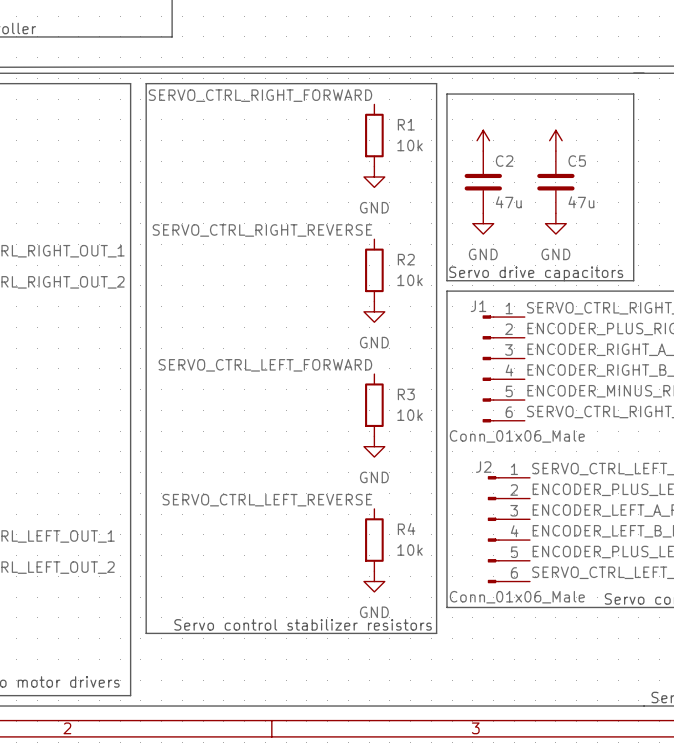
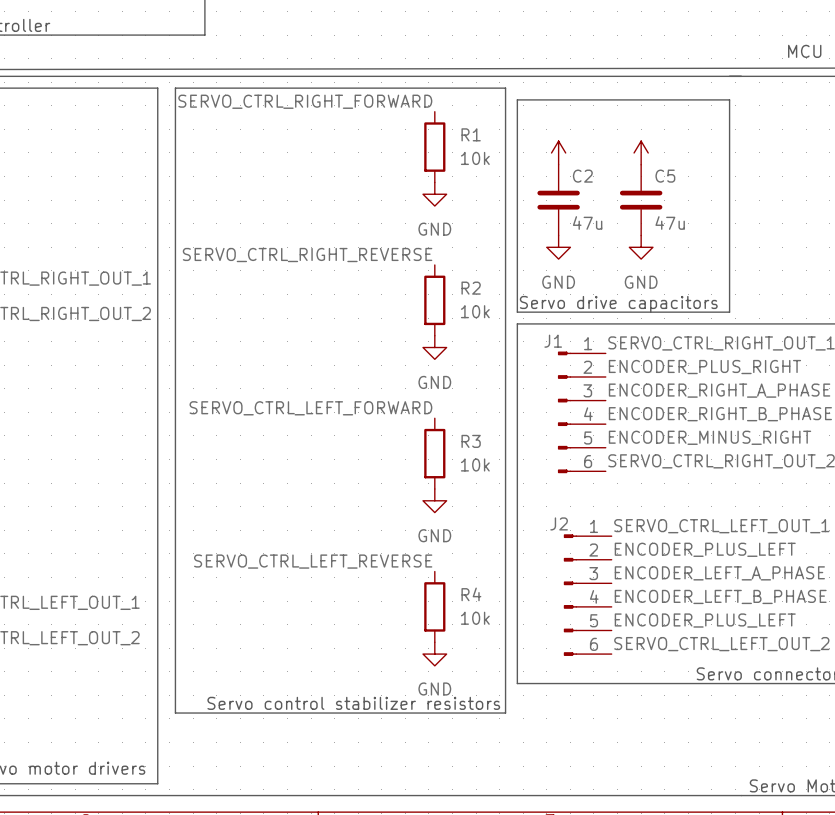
J1 value: Conn_01x06_Male (517, 436) -> none
J2 value: Conn_01x06_Male (517, 597) -> none

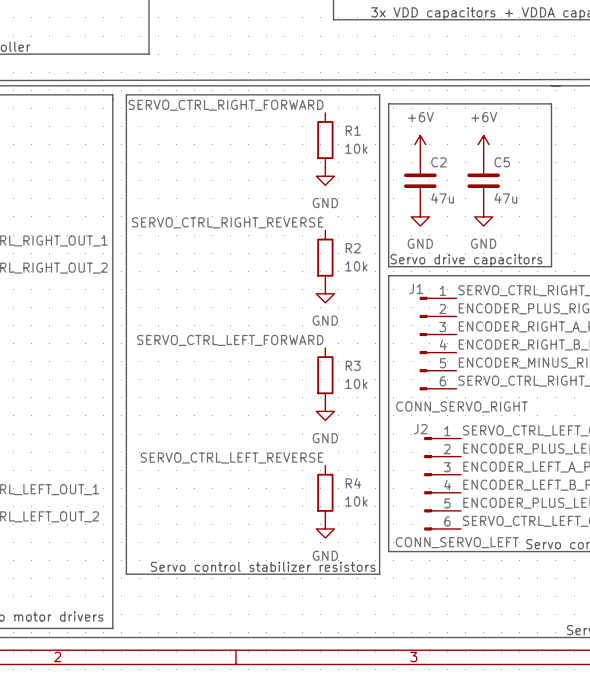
power symbol text: none -> +6V (420, 117)
power symbol text: none -> +6V (484, 117)
J1 value: none -> CONN_SERVO_RIGHT (462, 406)
J2 value: none -> CONN_SERVO_LEFT (457, 542)

